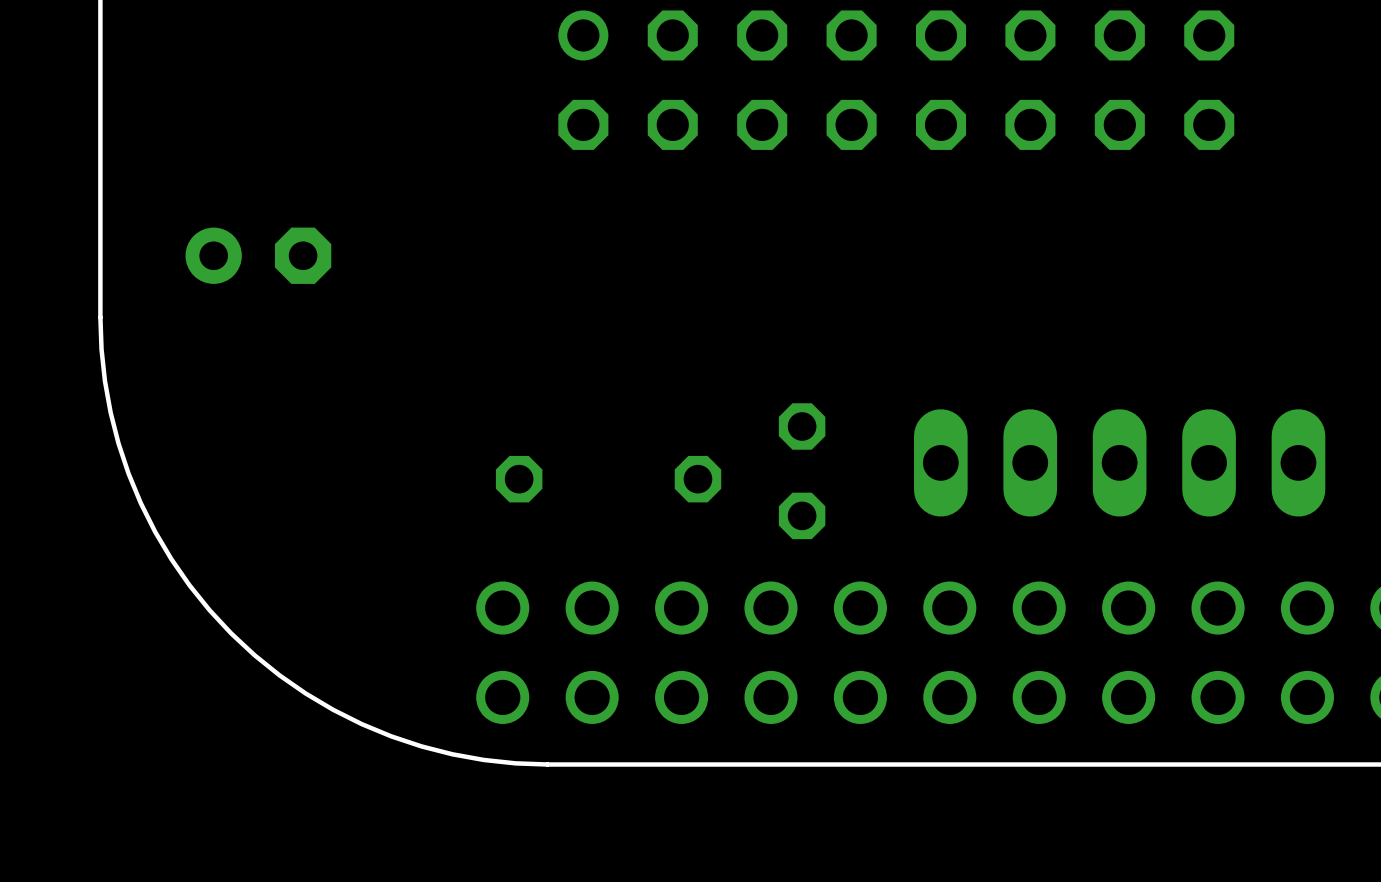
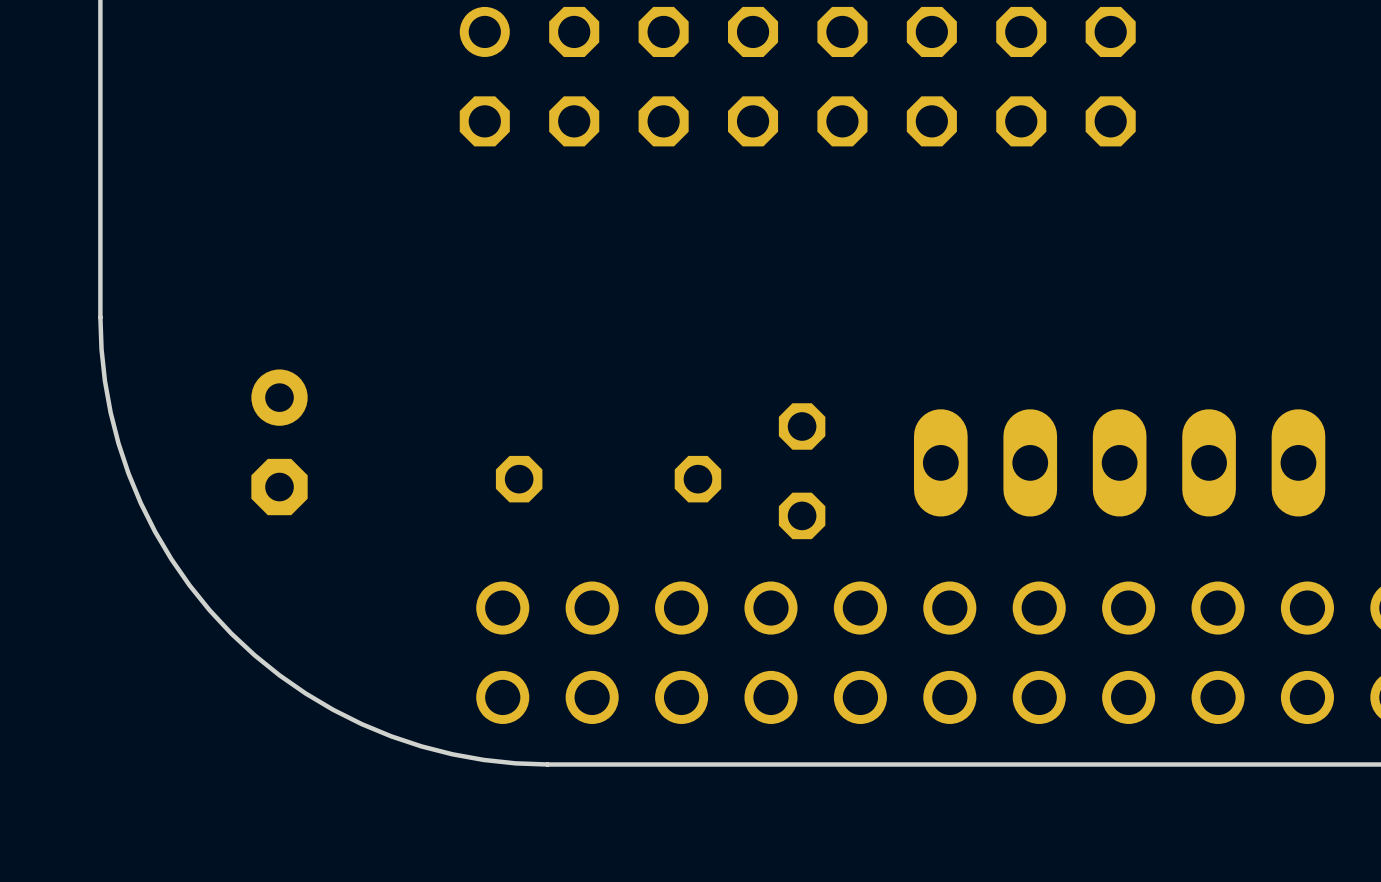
part position: (896, 80) -> (797, 76)
part rotation: 0° (258, 255) -> 90° clockwise (279, 442)
part position: (258, 255) -> (279, 442)

